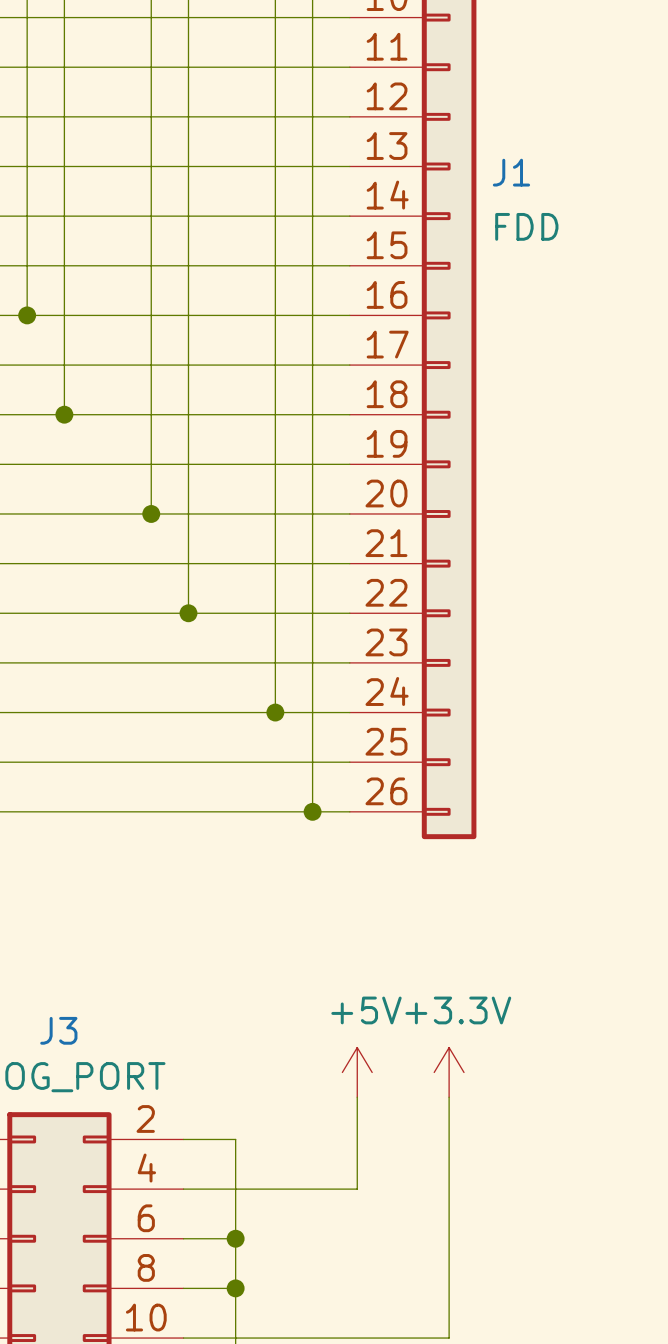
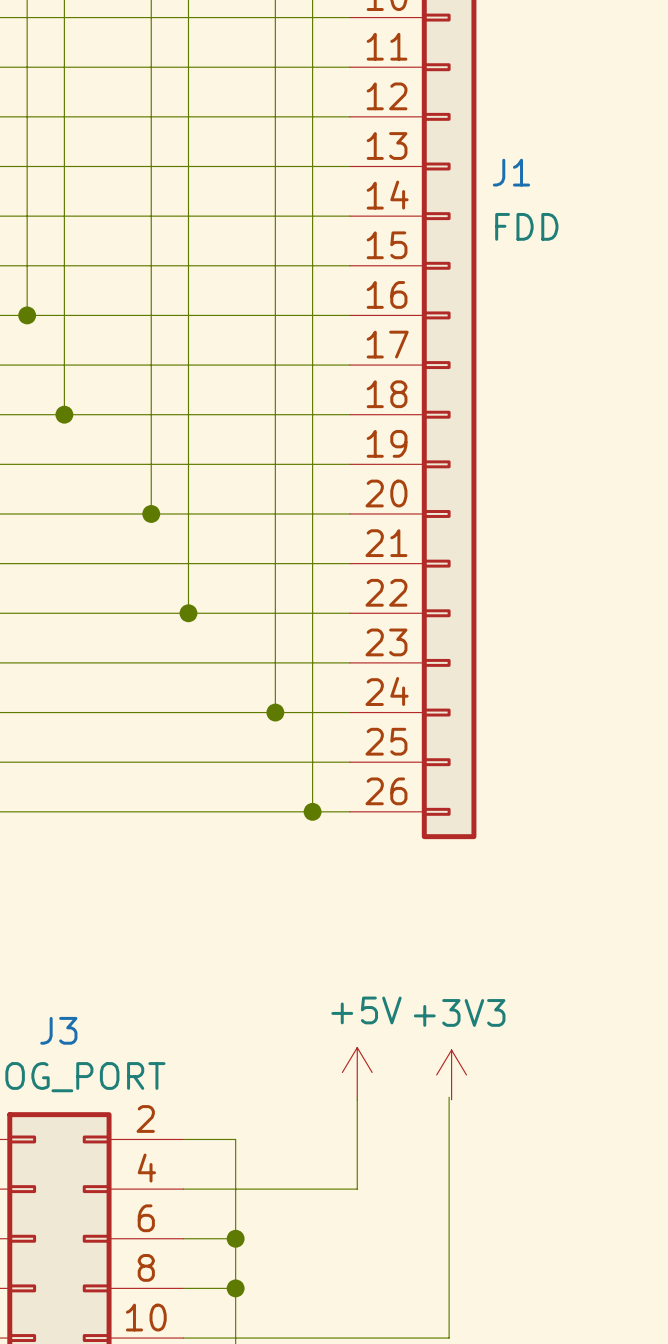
power symbol: +3.3V (449, 1072) -> +3V3 (451, 1074)

